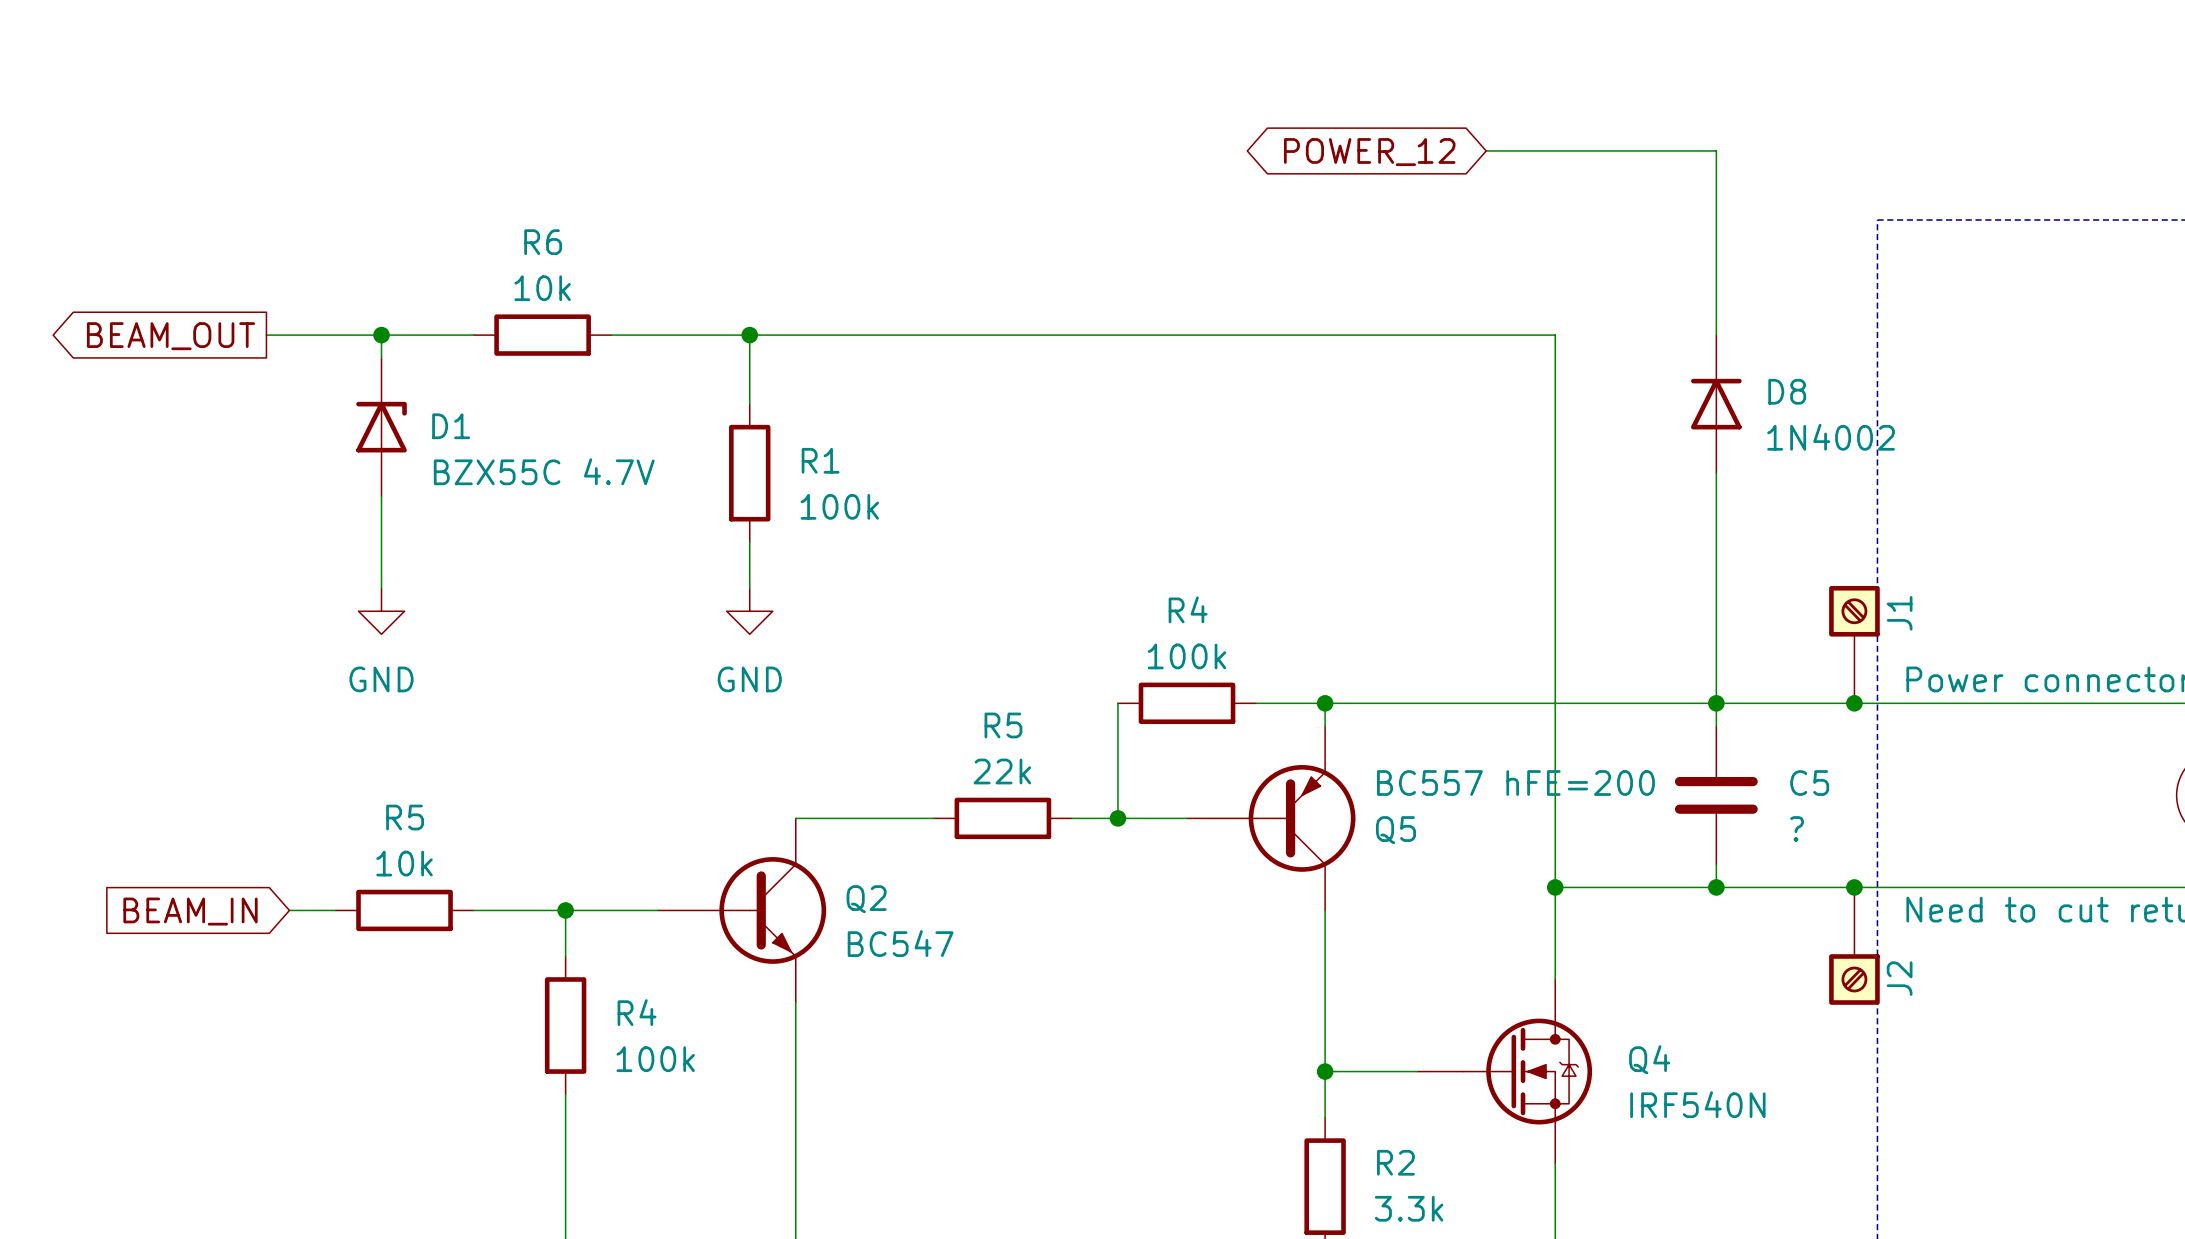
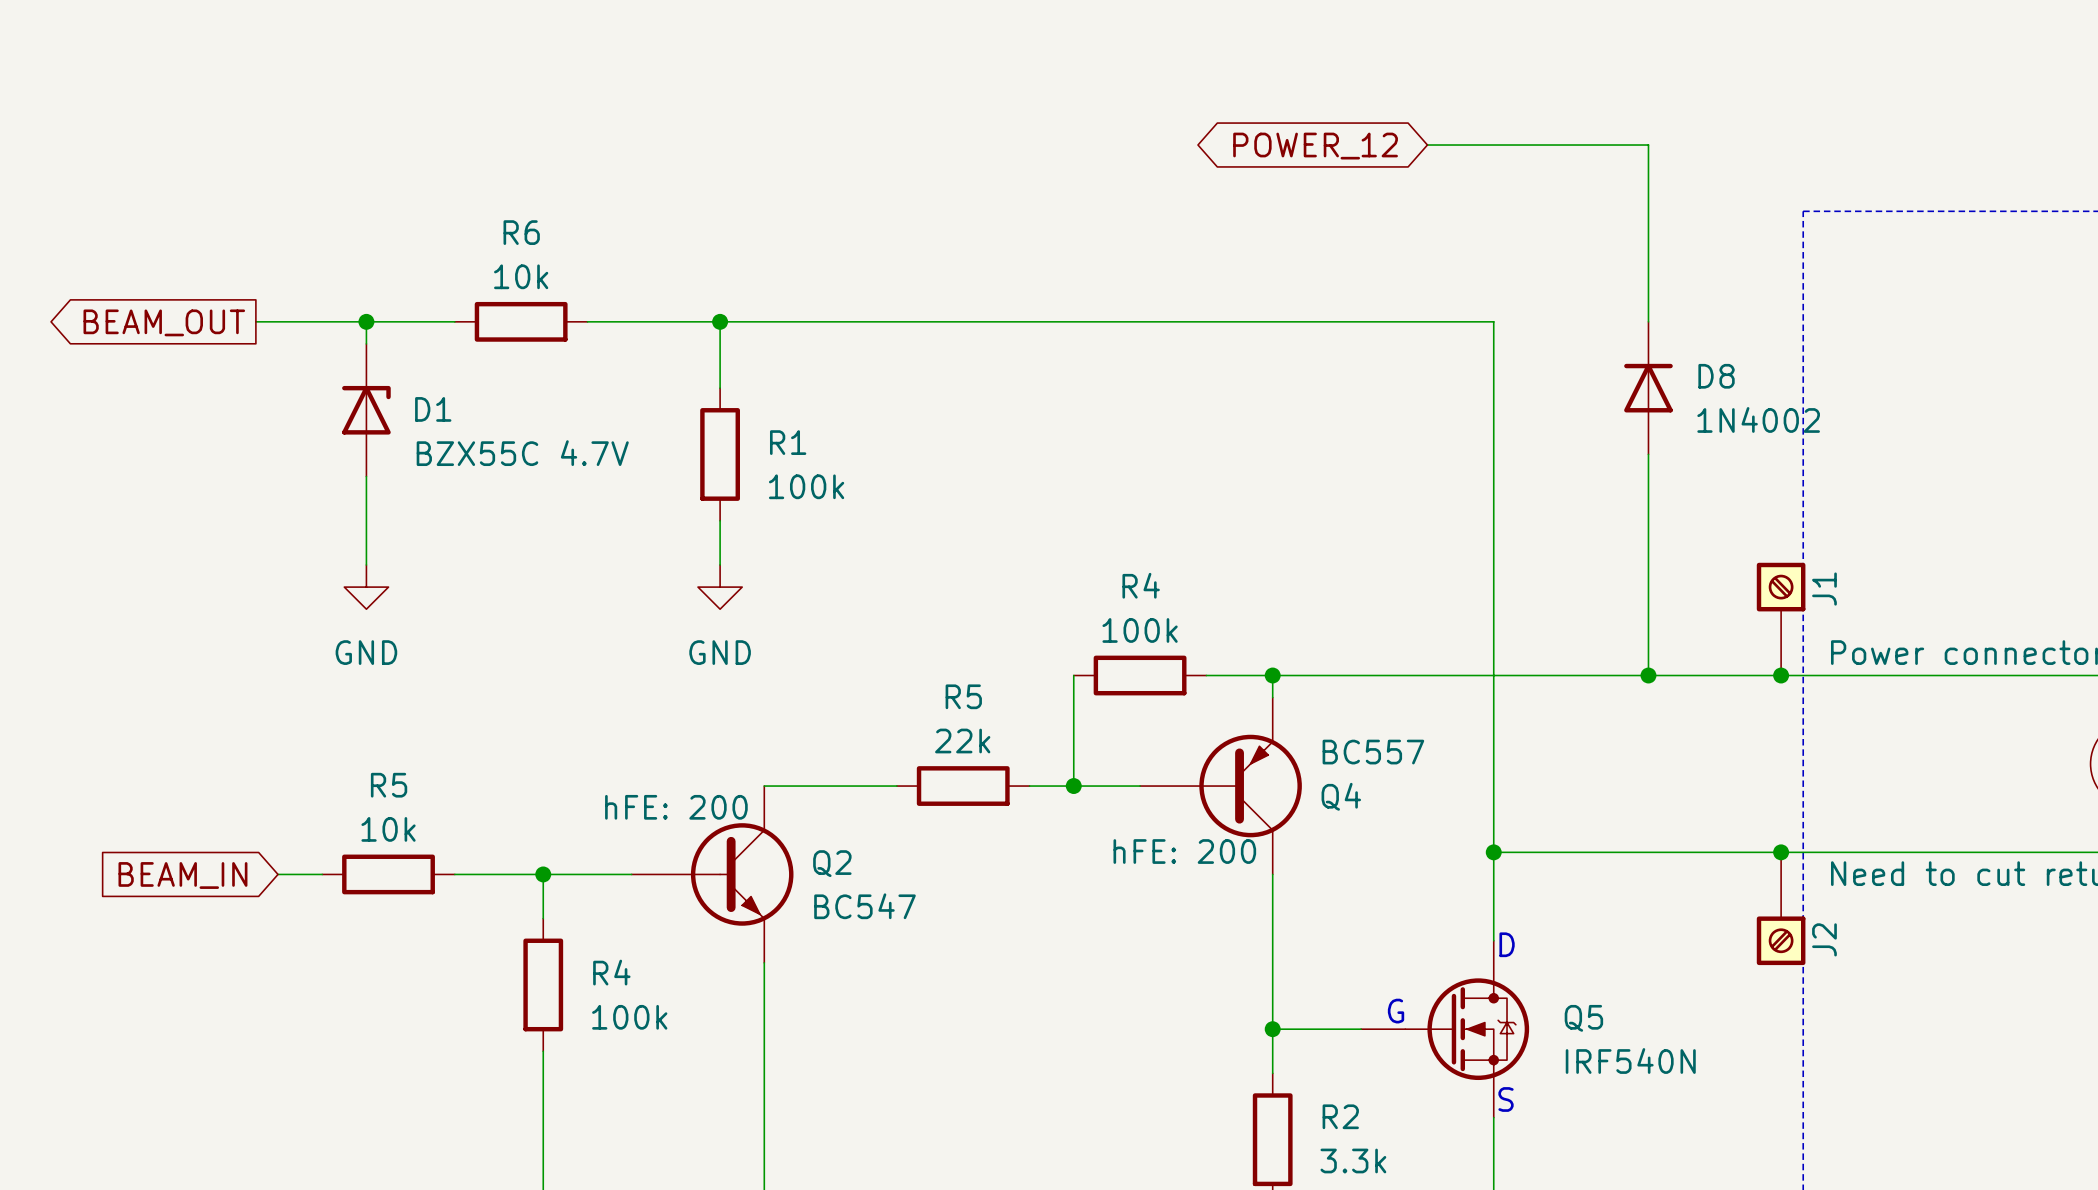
wire: (1716, 703) (1716, 726) -> none
Q5 value: BC557 hFE=200 (1515, 783) -> BC557 (1373, 752)
C5: ? (1716, 795) -> none
Q5 name: Q5 (1395, 830) -> Q4 (1341, 796)
Q2 text: none -> hFE: 200 (676, 807)
wire: (1716, 864) (1716, 887) -> none
Q5 text: none -> hFE: 200 (1184, 851)
junction: (1716, 887) -> none
text: none -> D (1507, 944)
text: none -> G (1396, 1011)
Q4 name: Q4 (1649, 1059) -> Q5 (1583, 1018)
text: none -> S (1506, 1099)

